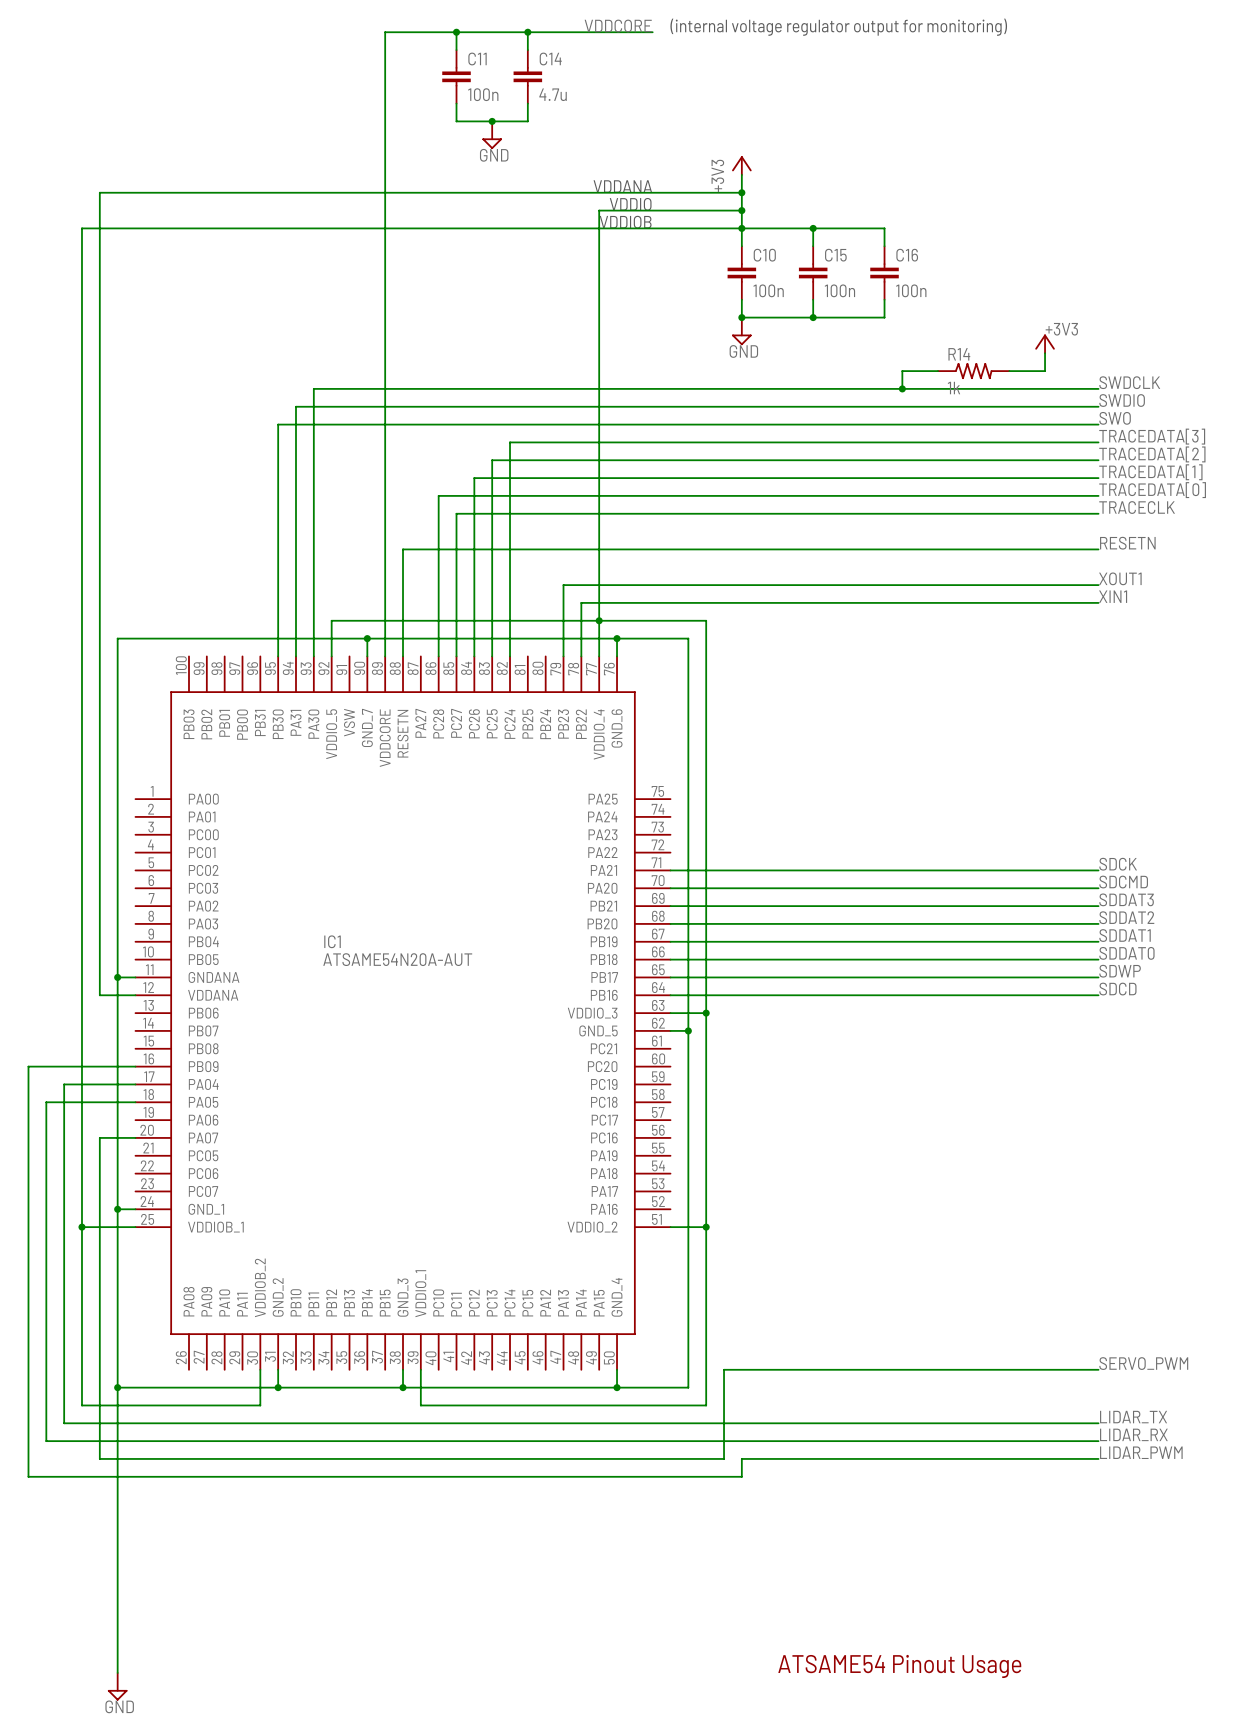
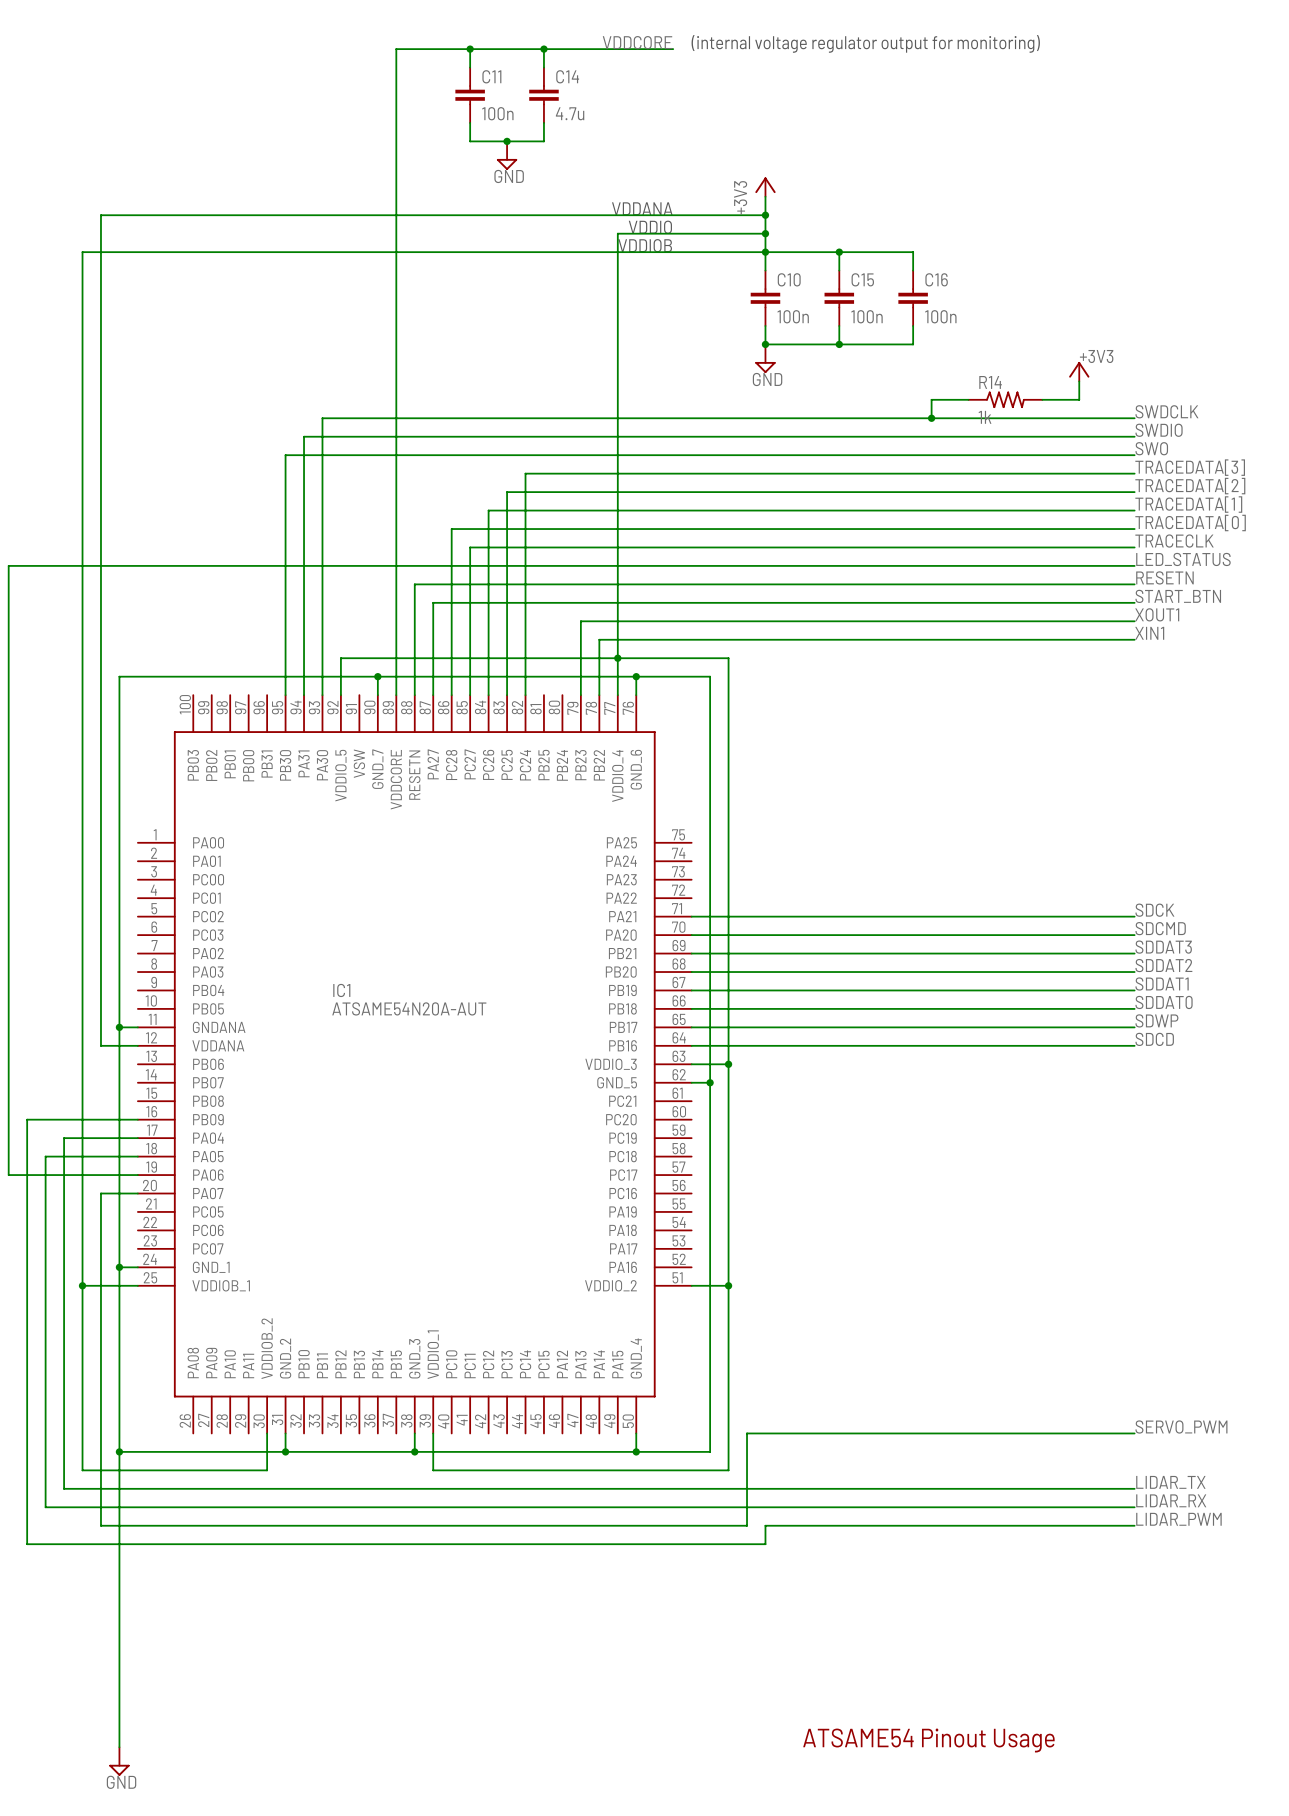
label: none -> LED_STATUS (1183, 559)
wire: none -> (1134, 565) (8, 565) (8, 1175) (137, 1175)
label: none -> START_BTN (1178, 596)
wire: none -> (1134, 602) (433, 602) (433, 695)

